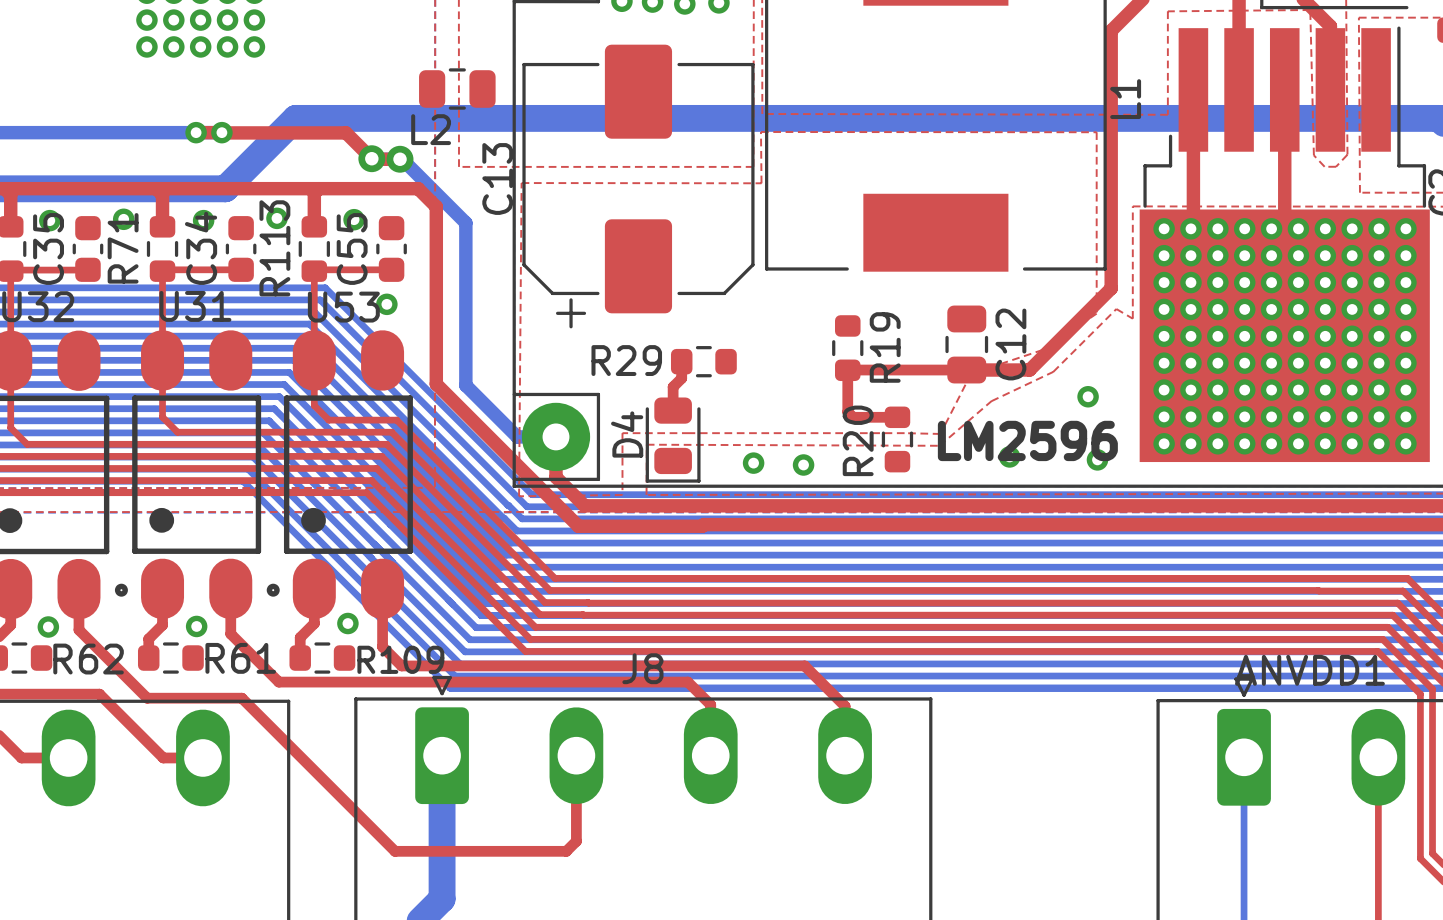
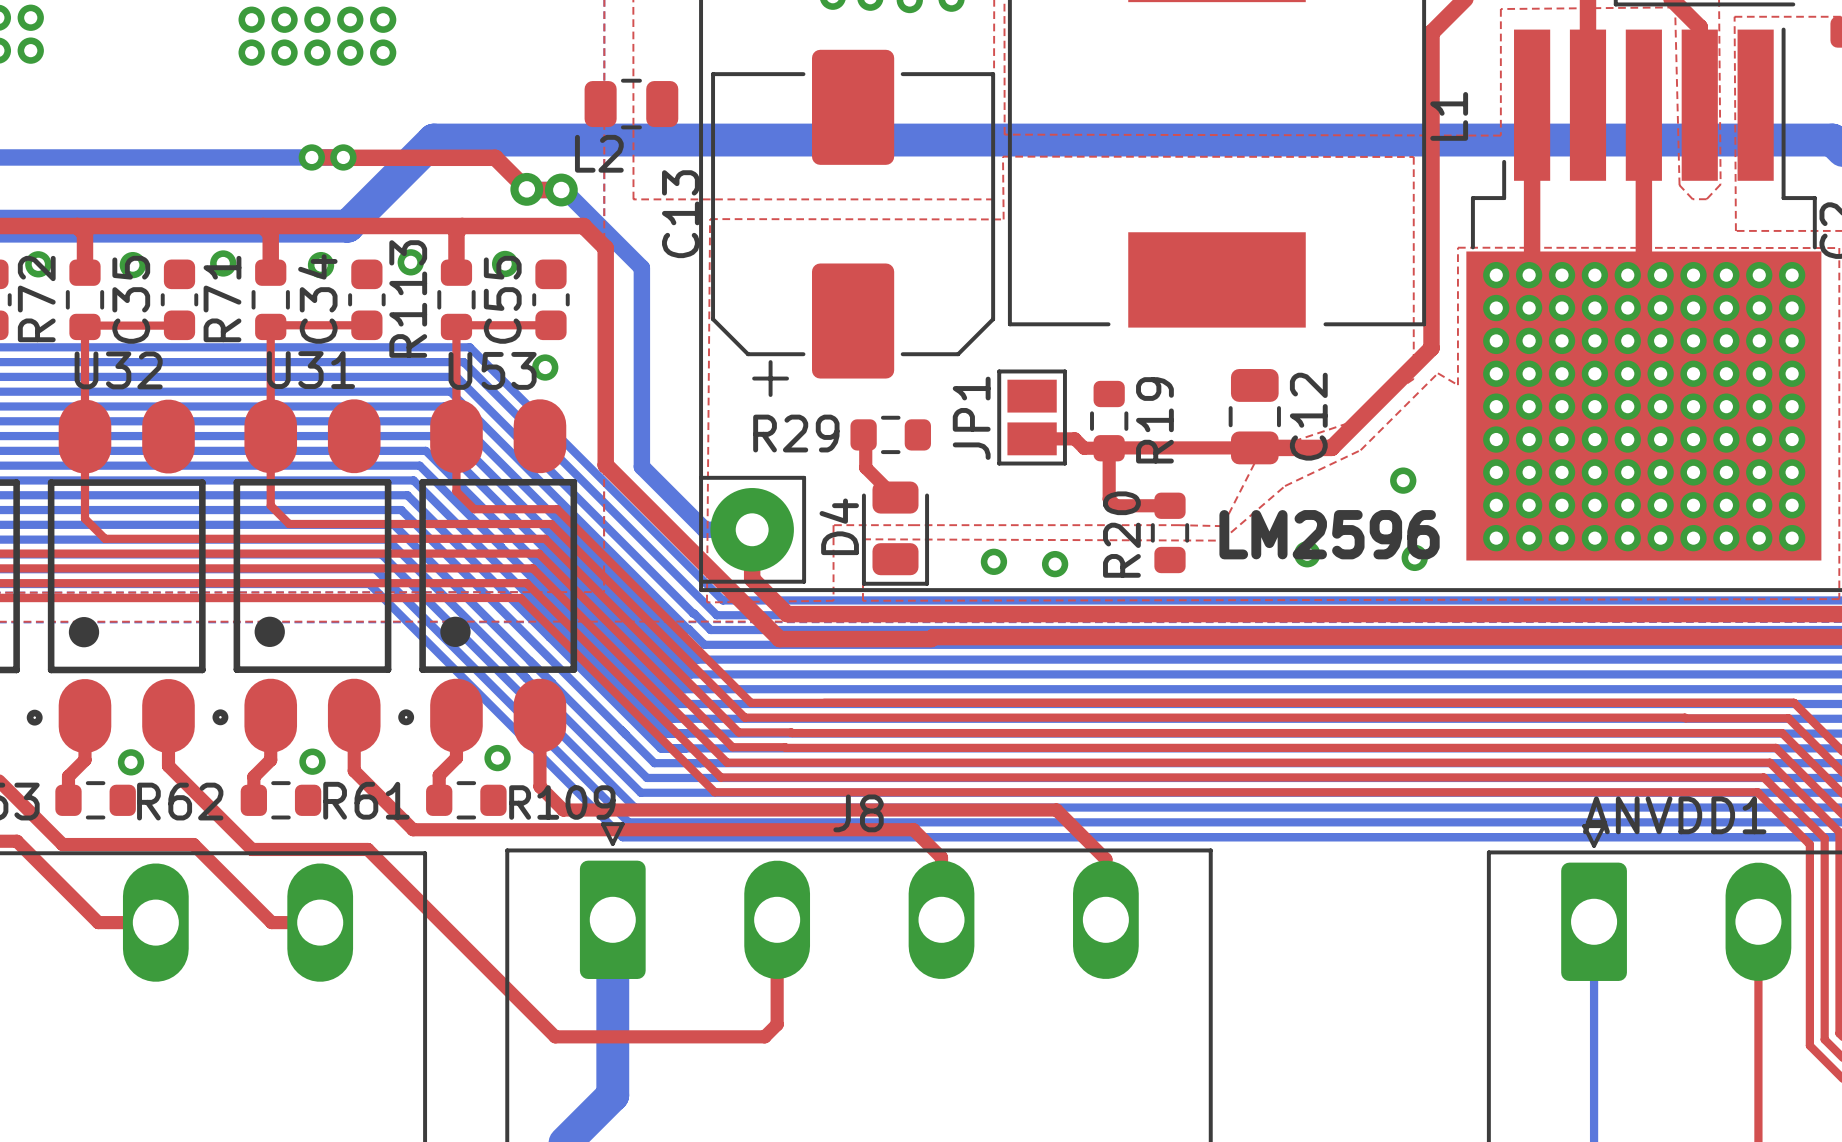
JP1: none -> (1032, 417)
top track: (681, 361) (681, 378) (673, 386) (673, 410) -> (863, 434) (865, 437) (865, 467) (895, 497)
R29 position: (703, 361) -> (890, 434)
top track: none -> (1032, 438) (1074, 438) (1084, 448) (1109, 448)

